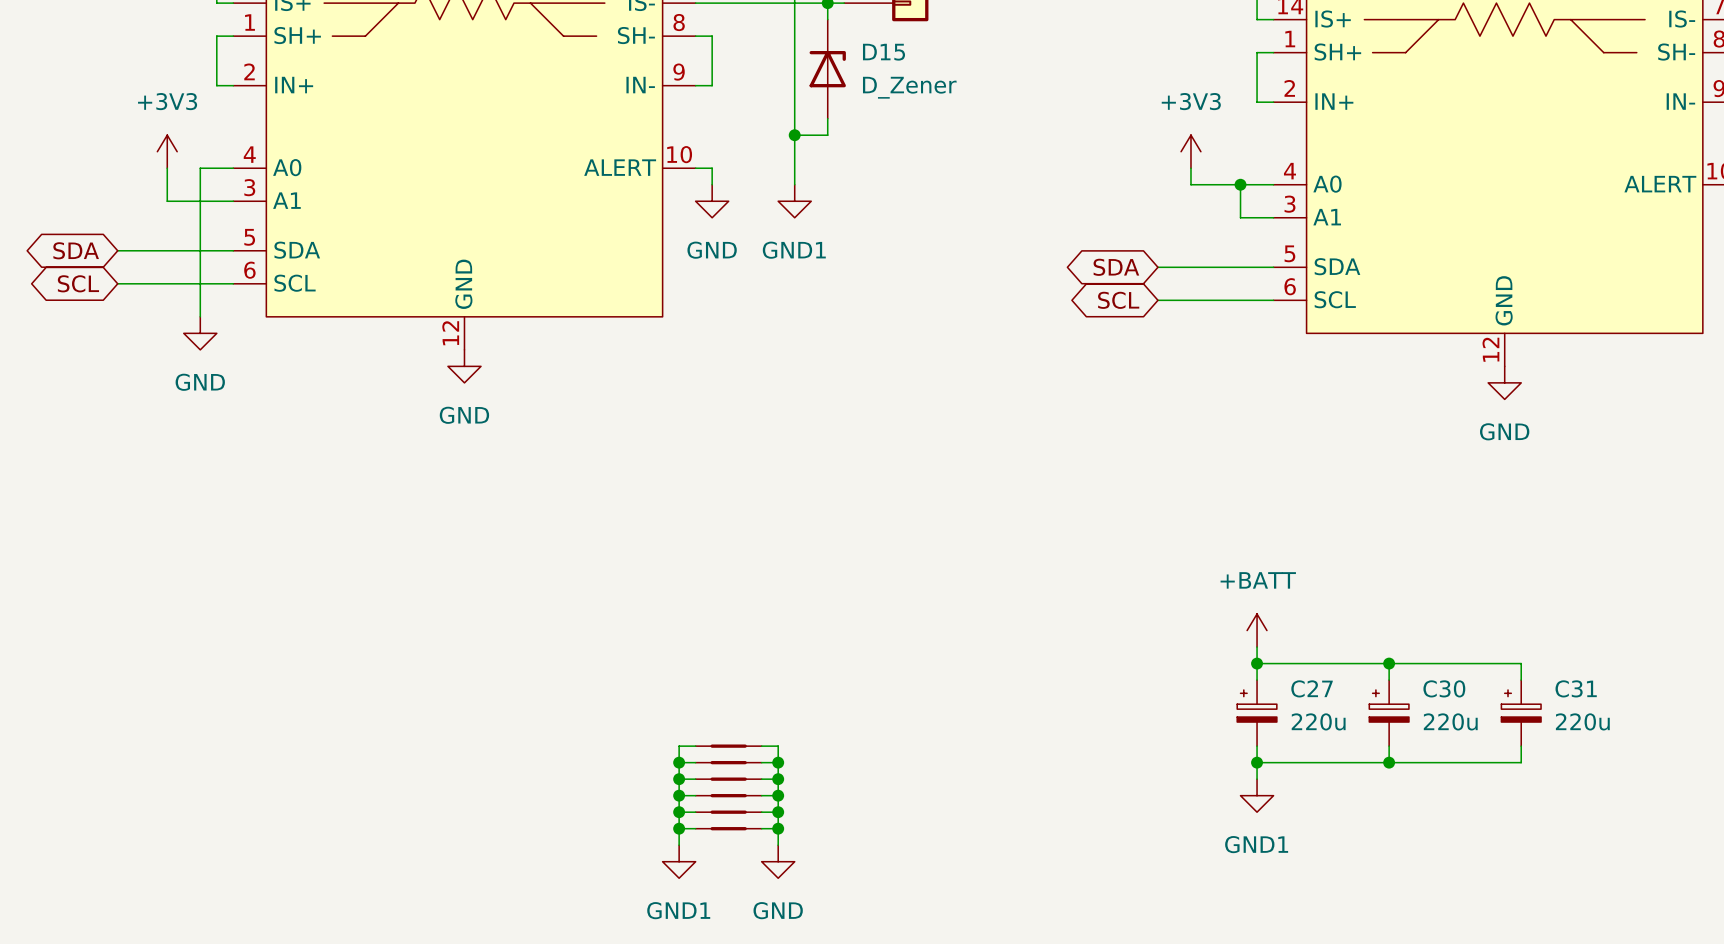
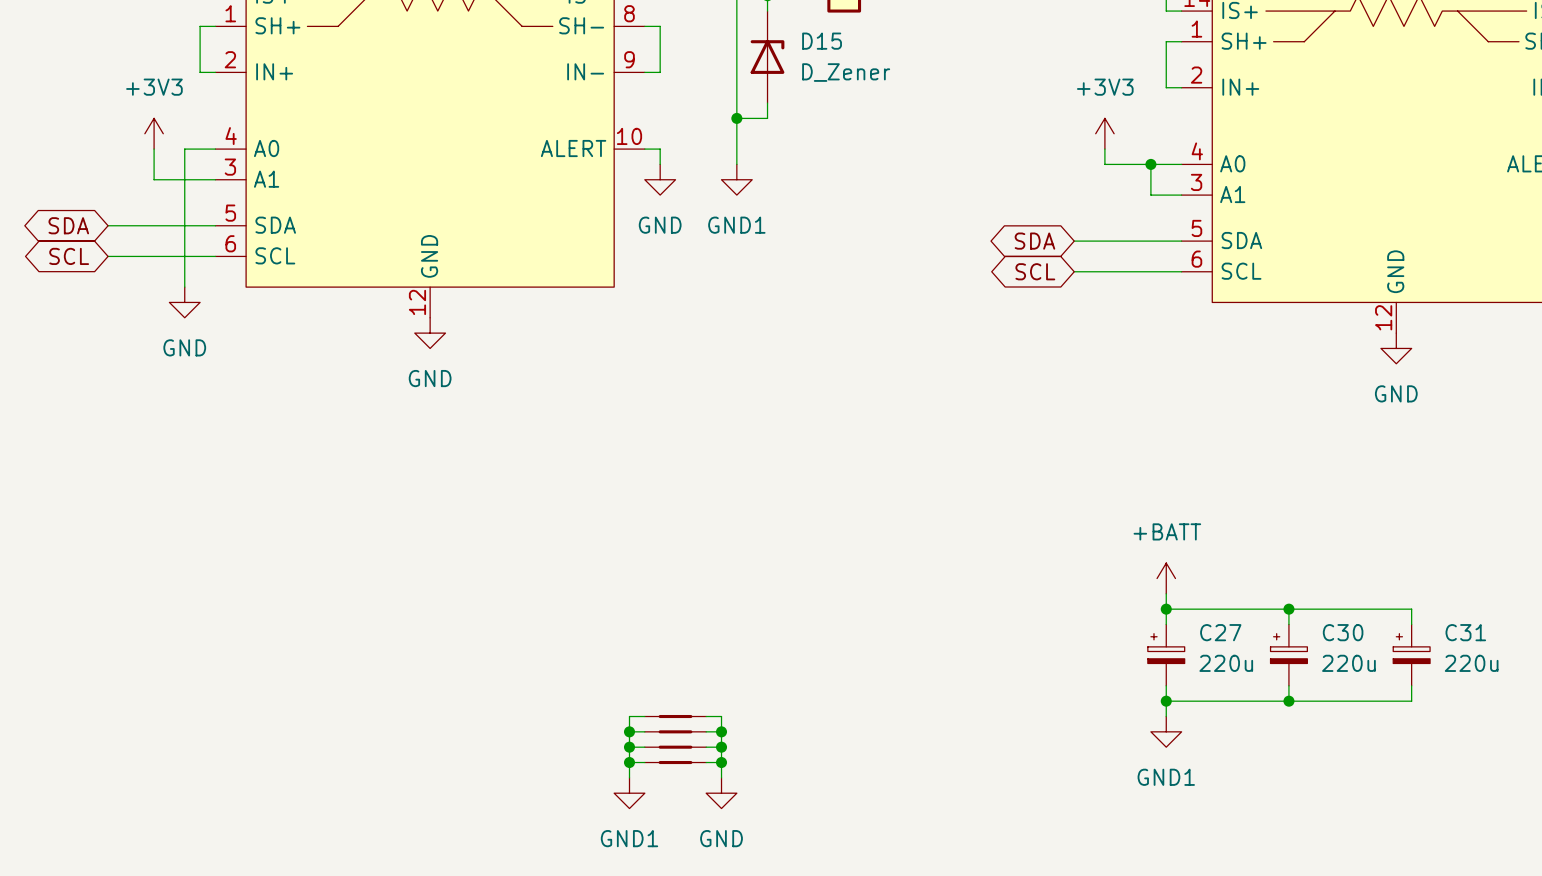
wire: (695, 746) (679, 746) (679, 779) -> none
part: (728, 746) -> none
wire: (761, 746) (778, 746) (778, 779) -> none
wire: (679, 762) (695, 762) -> none
junction: (679, 762) -> none
part: (728, 762) -> none
wire: (761, 762) (778, 762) -> none
junction: (778, 762) -> none
junction: (679, 779) -> none
junction: (778, 779) -> none

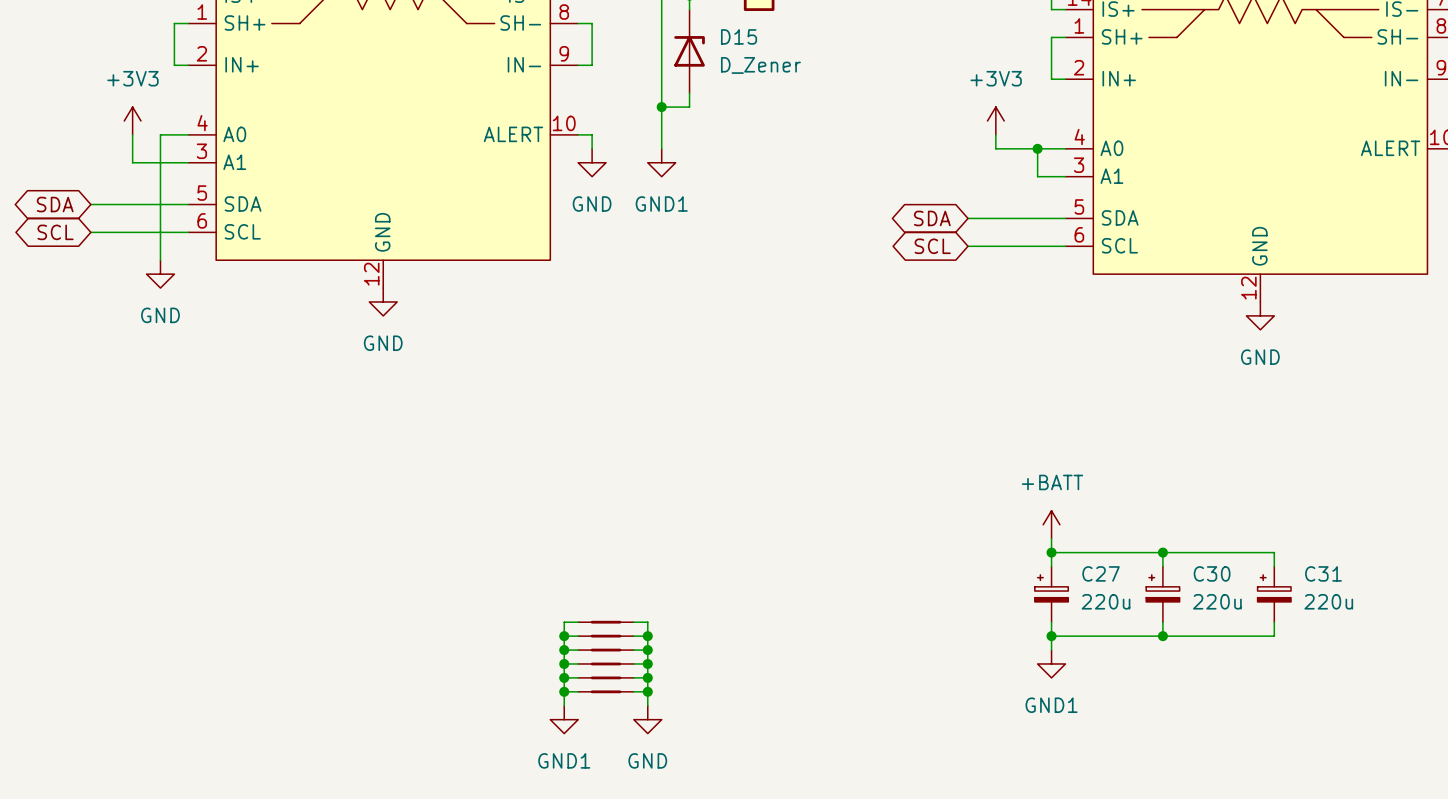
wire: none -> (578, 622) (564, 622) (564, 650)
part: none -> (606, 622)
wire: none -> (633, 622) (647, 622) (647, 650)
wire: none -> (564, 636) (578, 636)
junction: none -> (564, 636)
part: none -> (606, 636)
wire: none -> (633, 636) (647, 636)
junction: none -> (647, 636)
junction: none -> (564, 650)
junction: none -> (647, 650)

